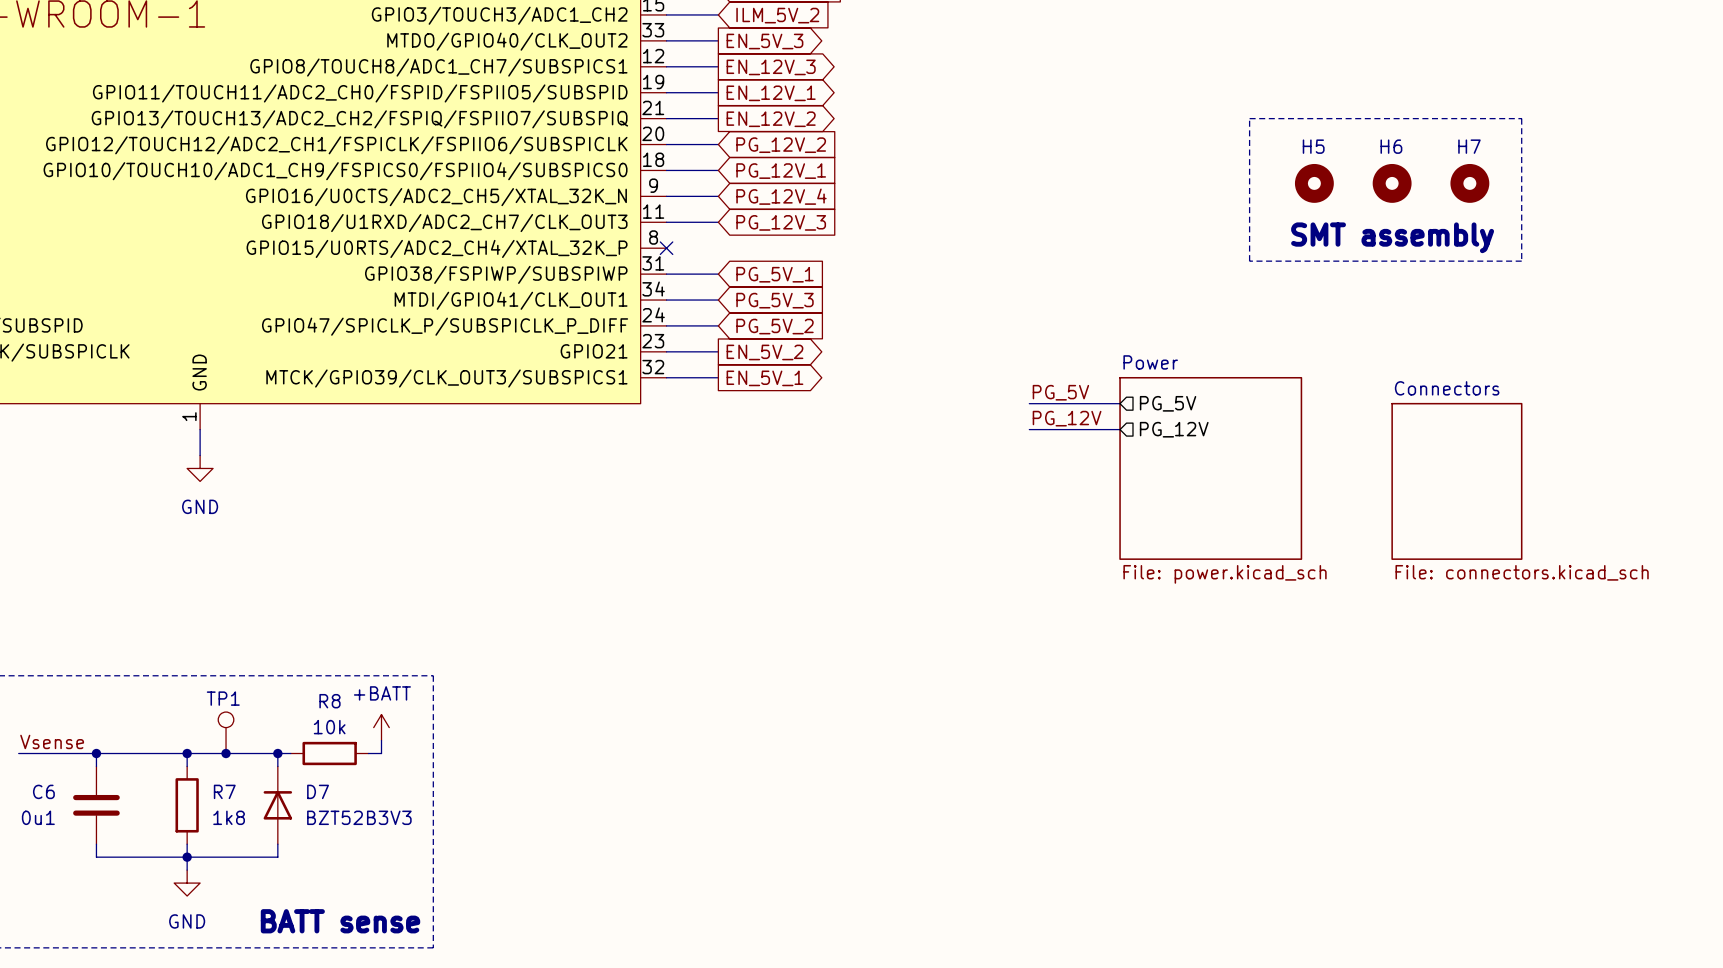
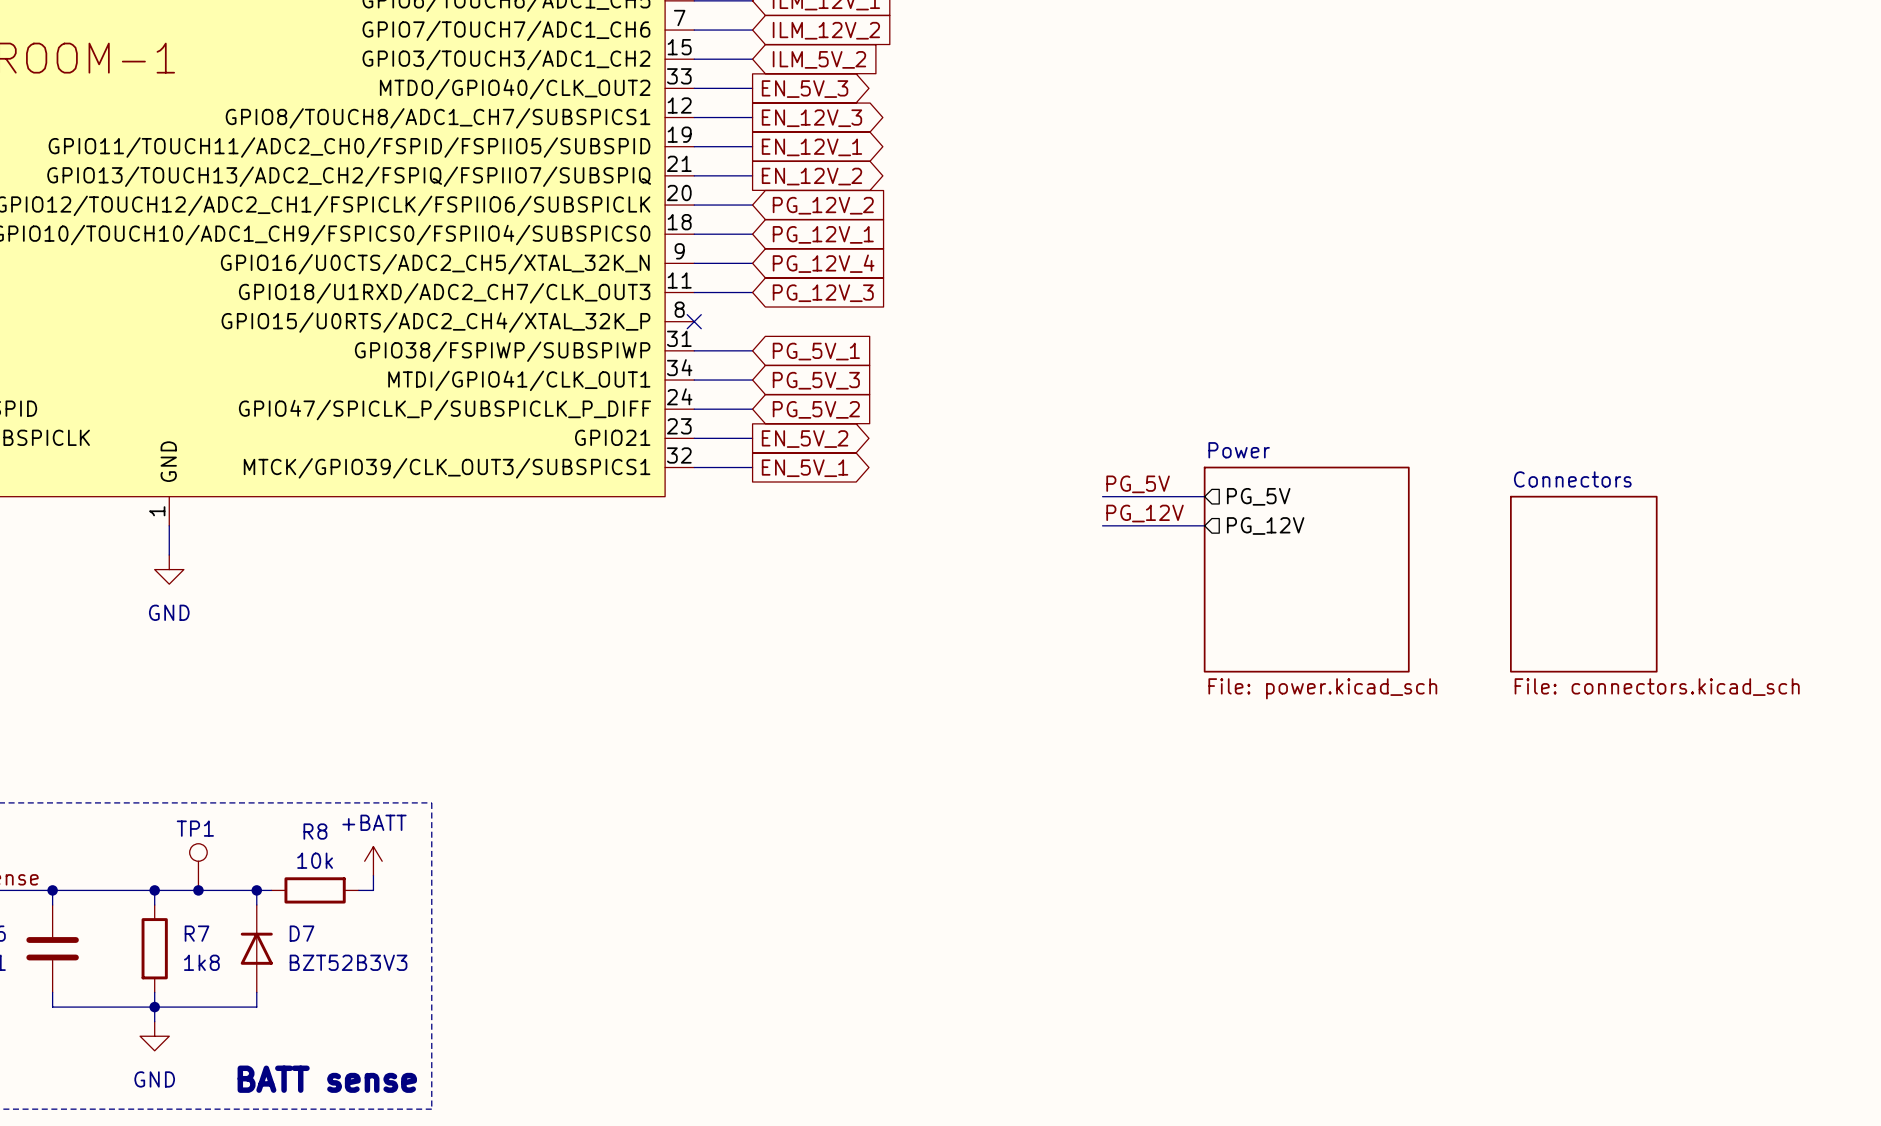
line: (1249, 118) (1521, 118) (1521, 261) (1249, 261) (1249, 118) -> none
H5: (1314, 183) -> none
H6: (1392, 183) -> none
H7: (1469, 183) -> none
text: SMT assembly (1392, 237) -> none

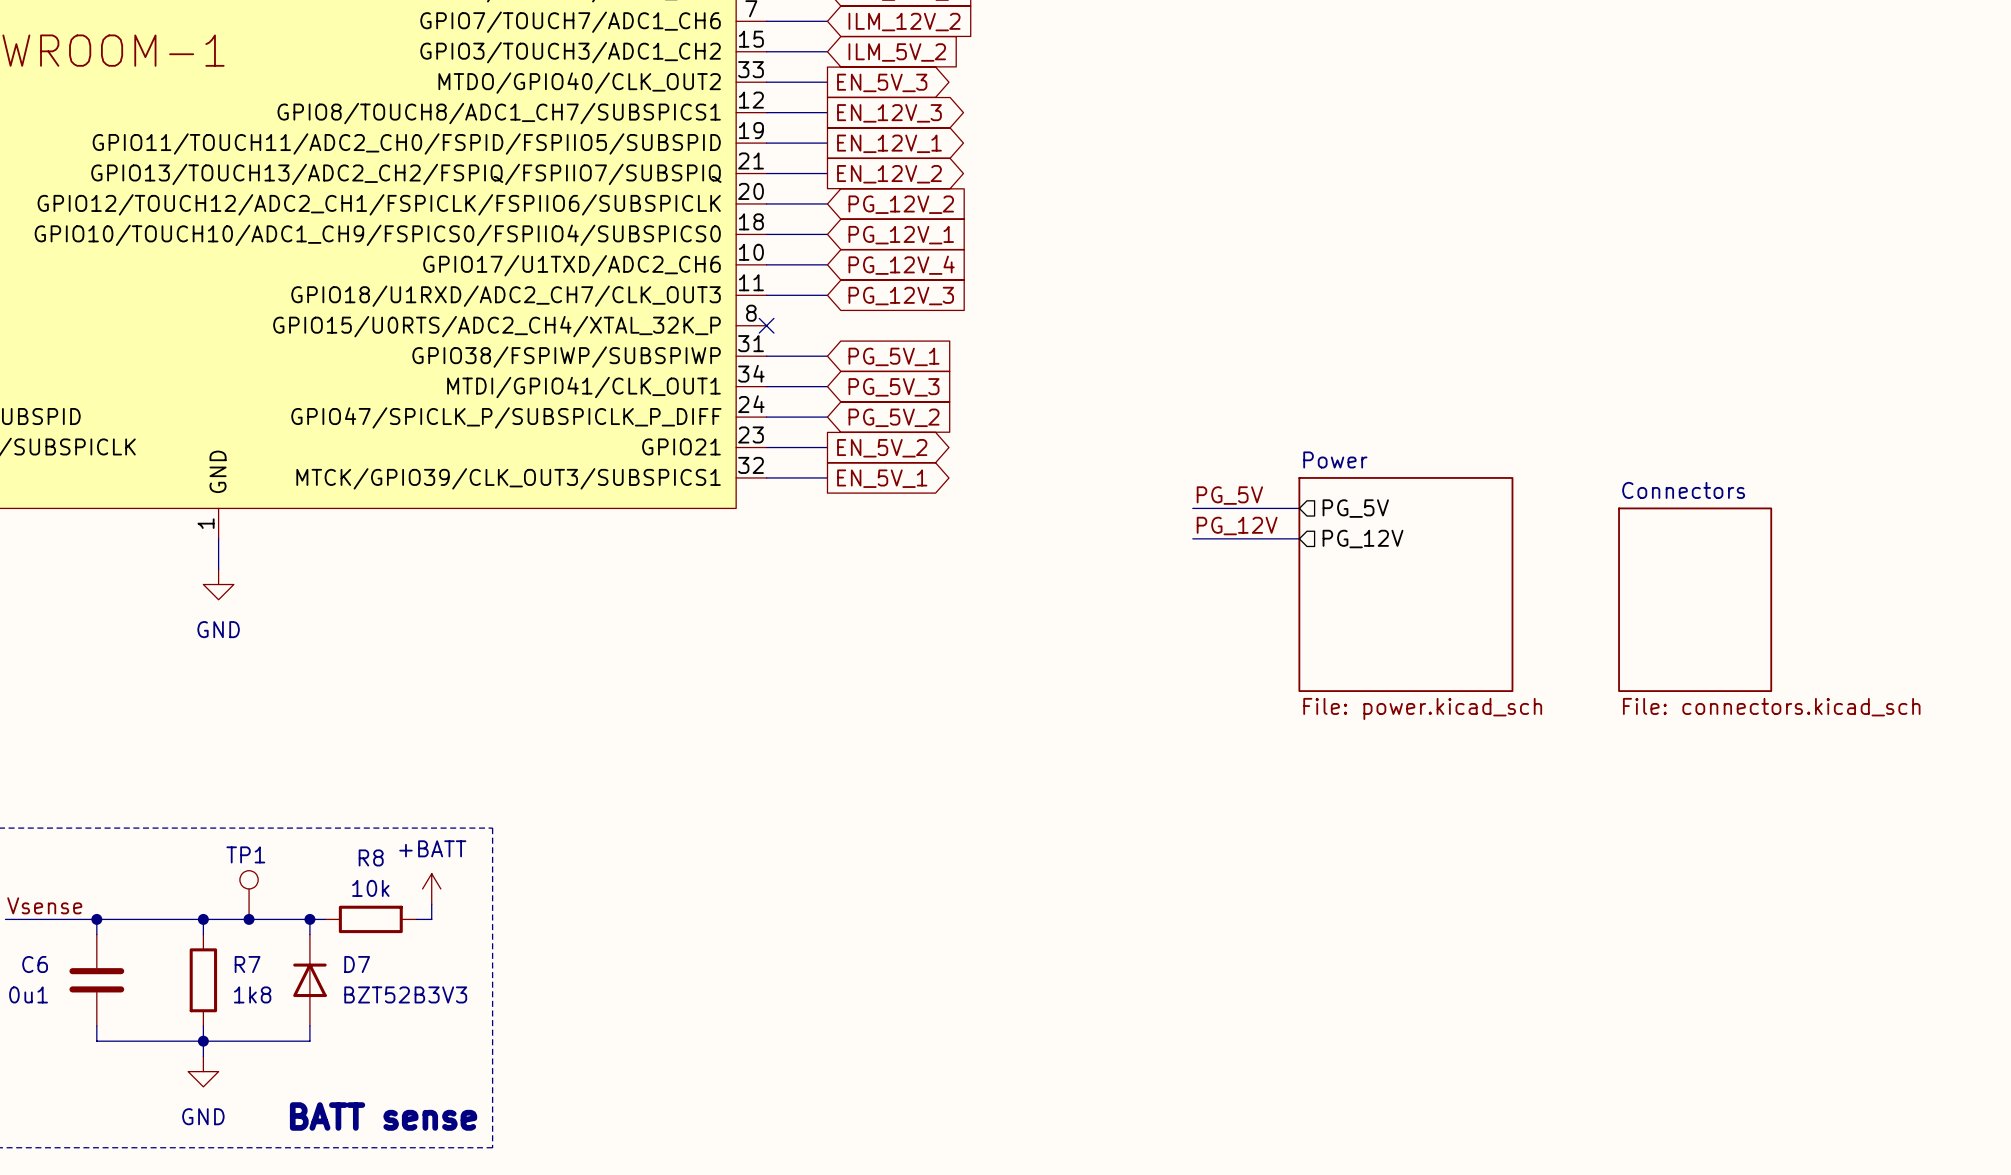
part pin number: 9 (679, 251) -> 10 (751, 252)
part pin name: GPIO16/U0CTS/ADC2_CH5/XTAL_32K_N (435, 264) -> GPIO17/U1TXD/ADC2_CH6 (572, 265)

